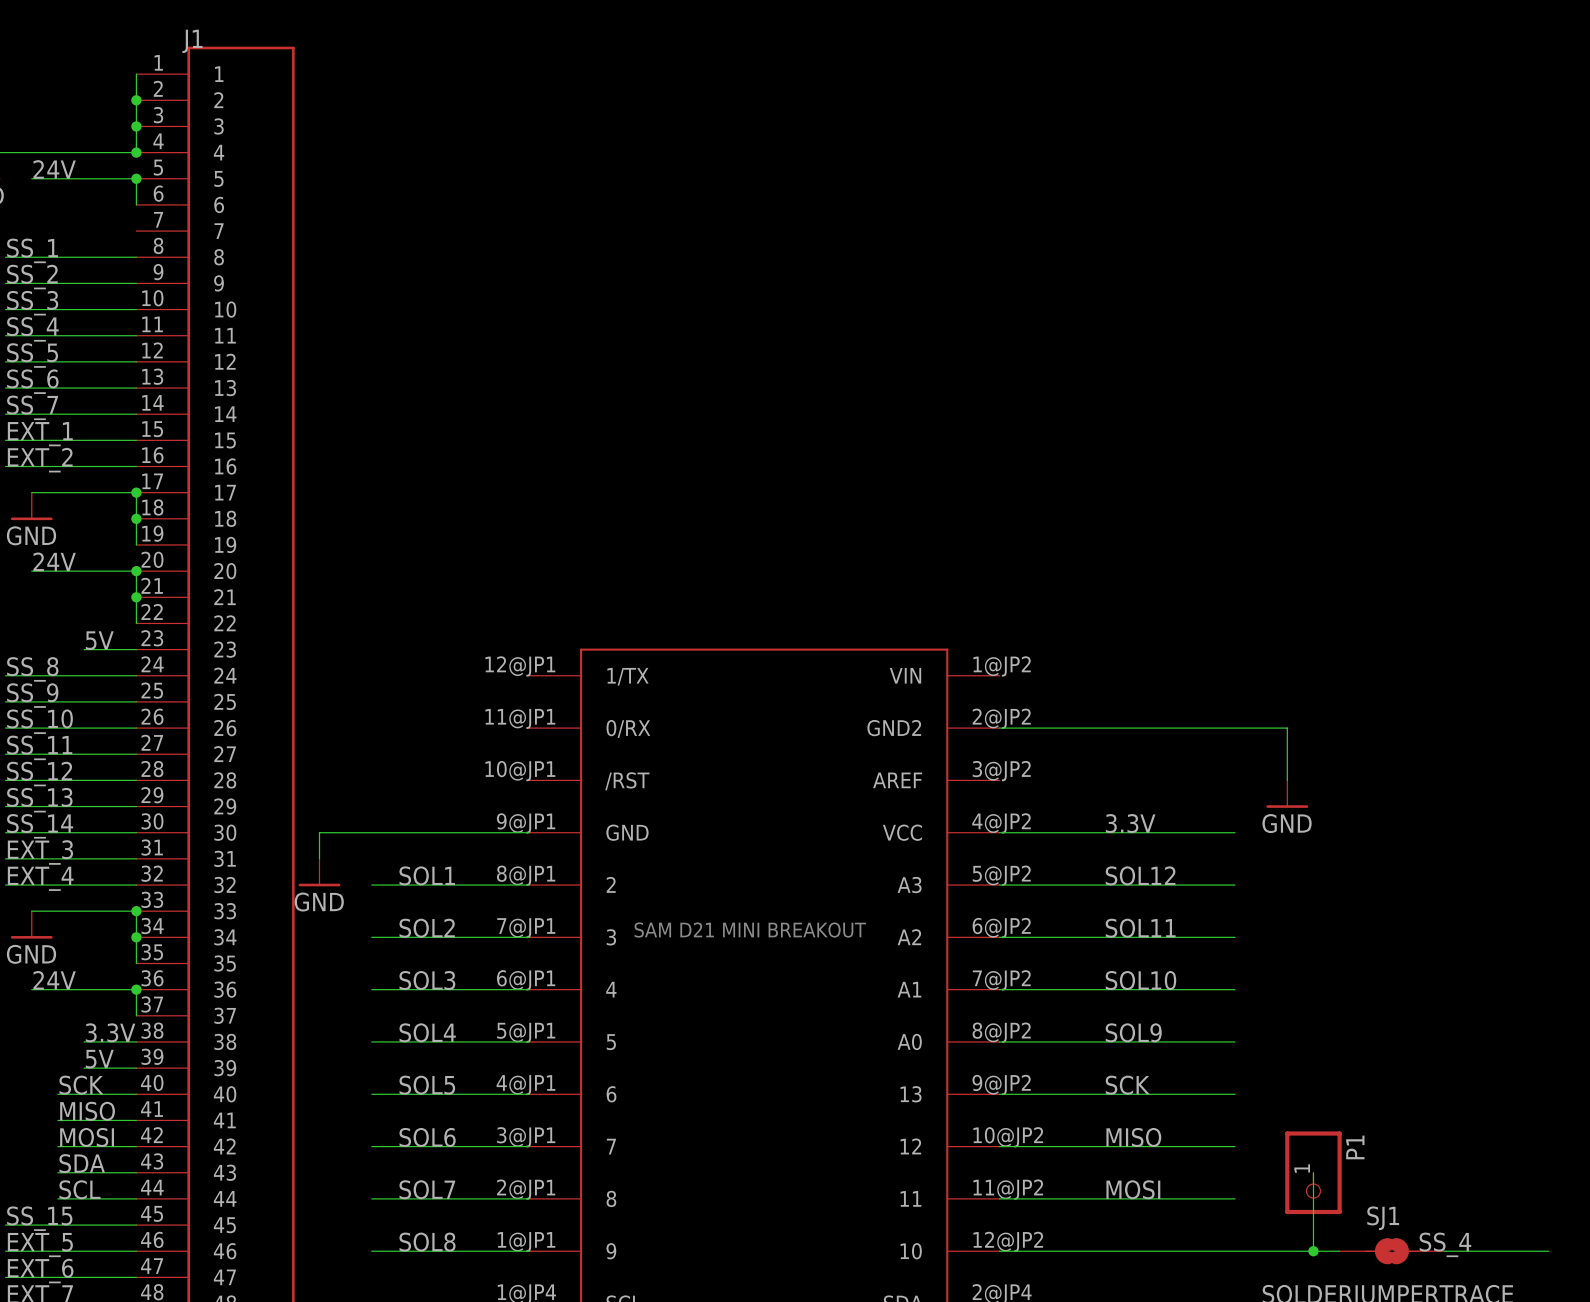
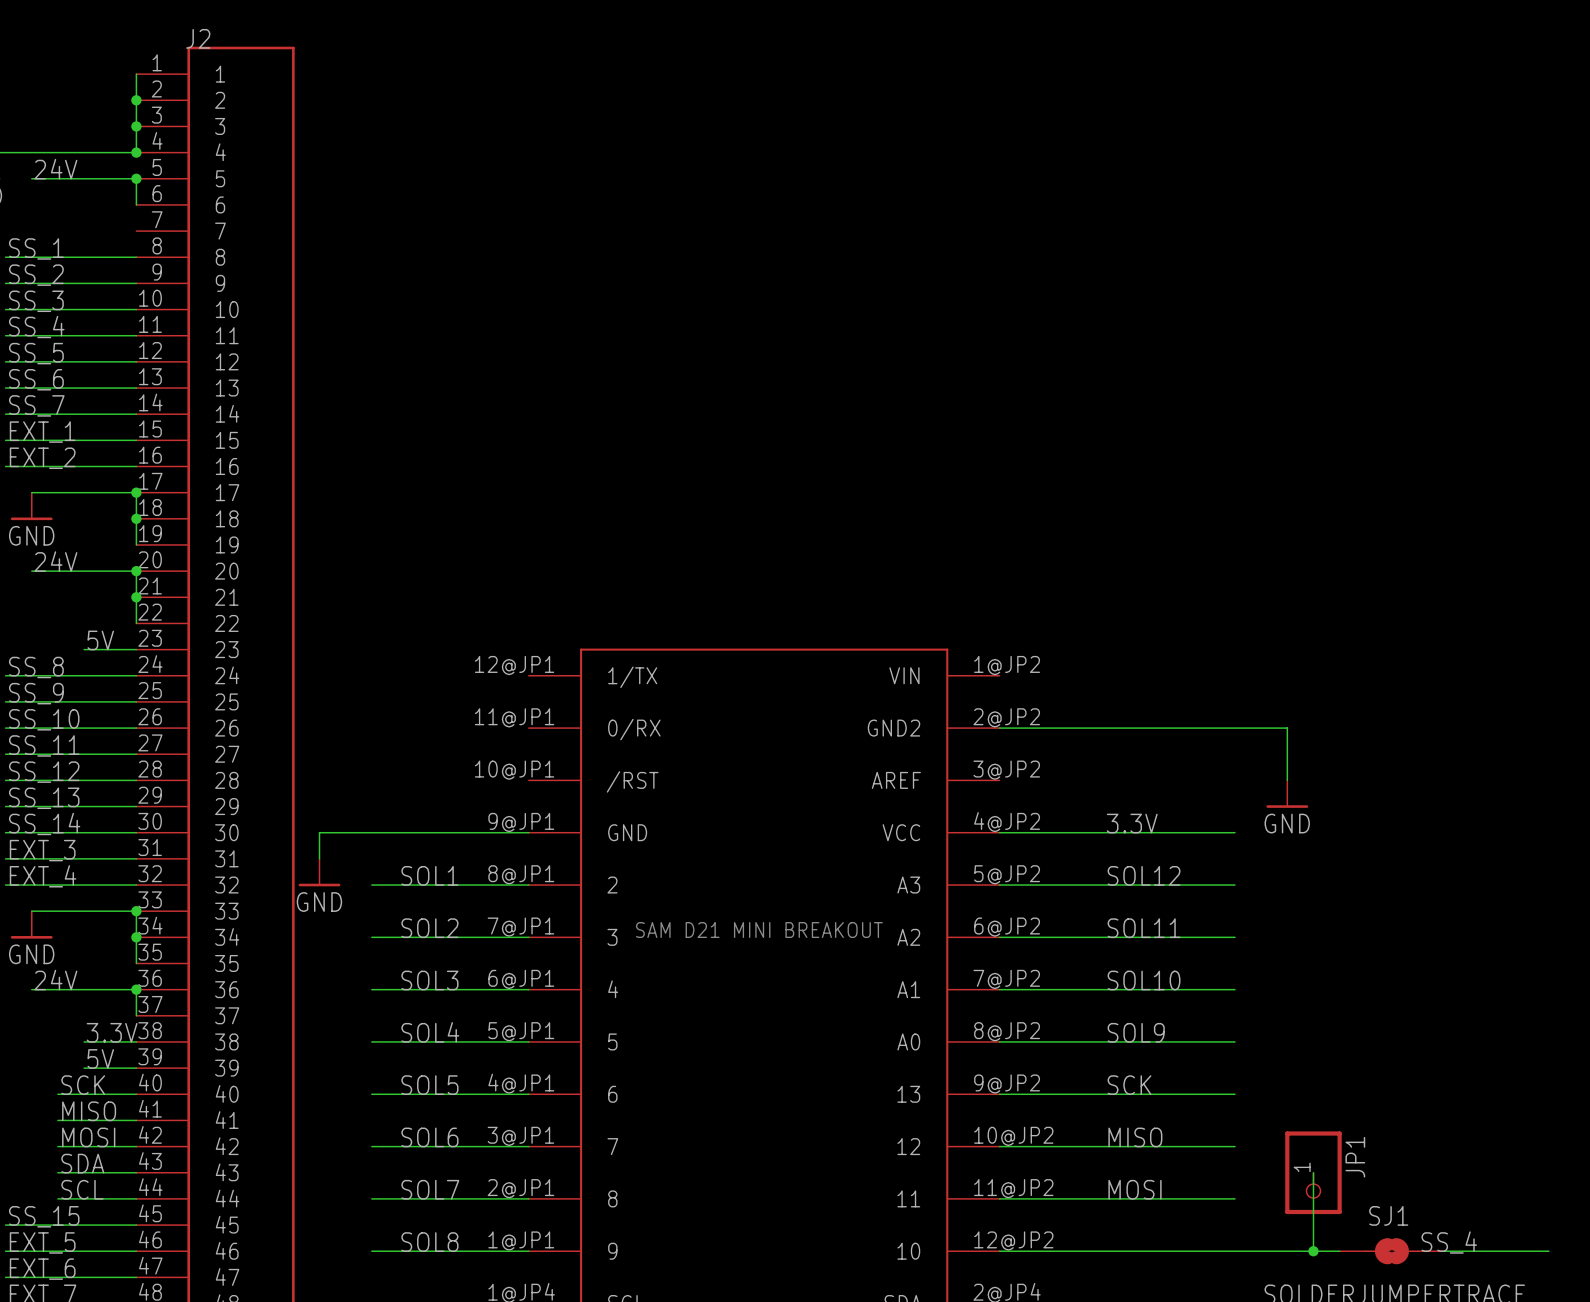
J1 name: J1 (192, 41) -> J2 (198, 38)
P1 name: P1 (1355, 1147) -> JP1 (1355, 1157)

